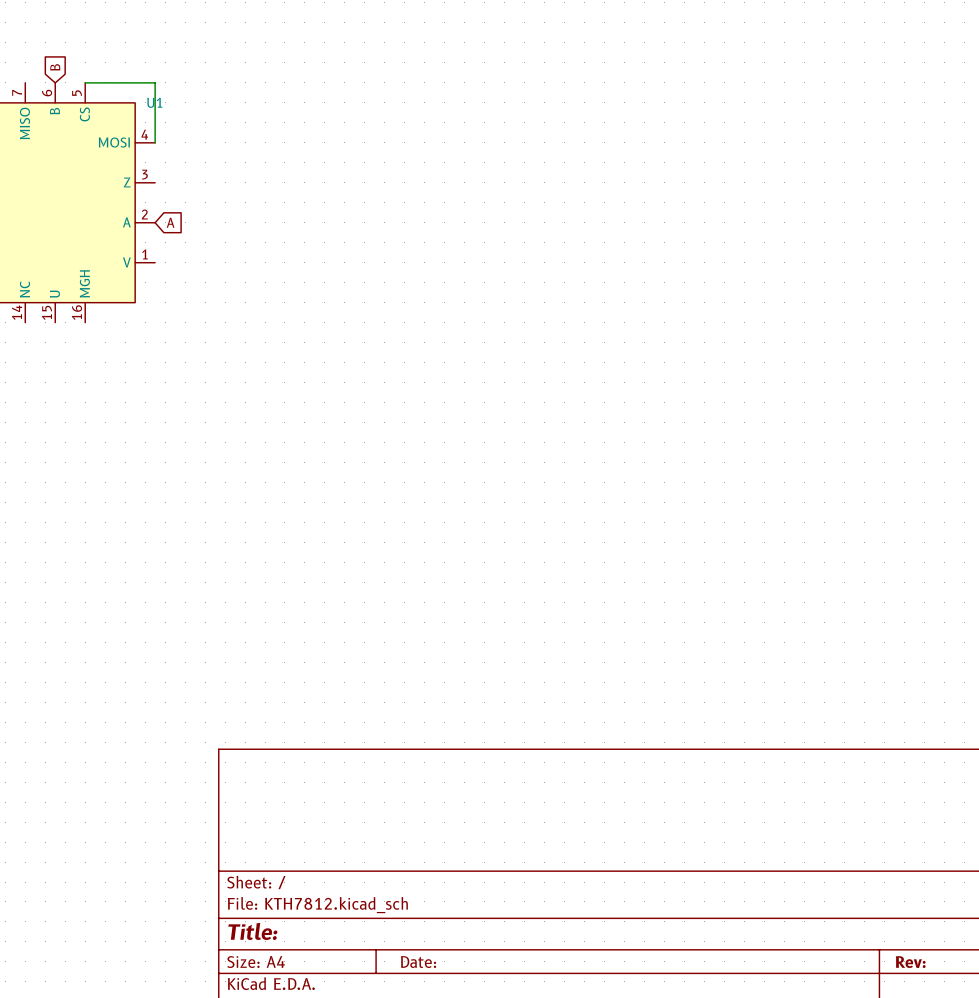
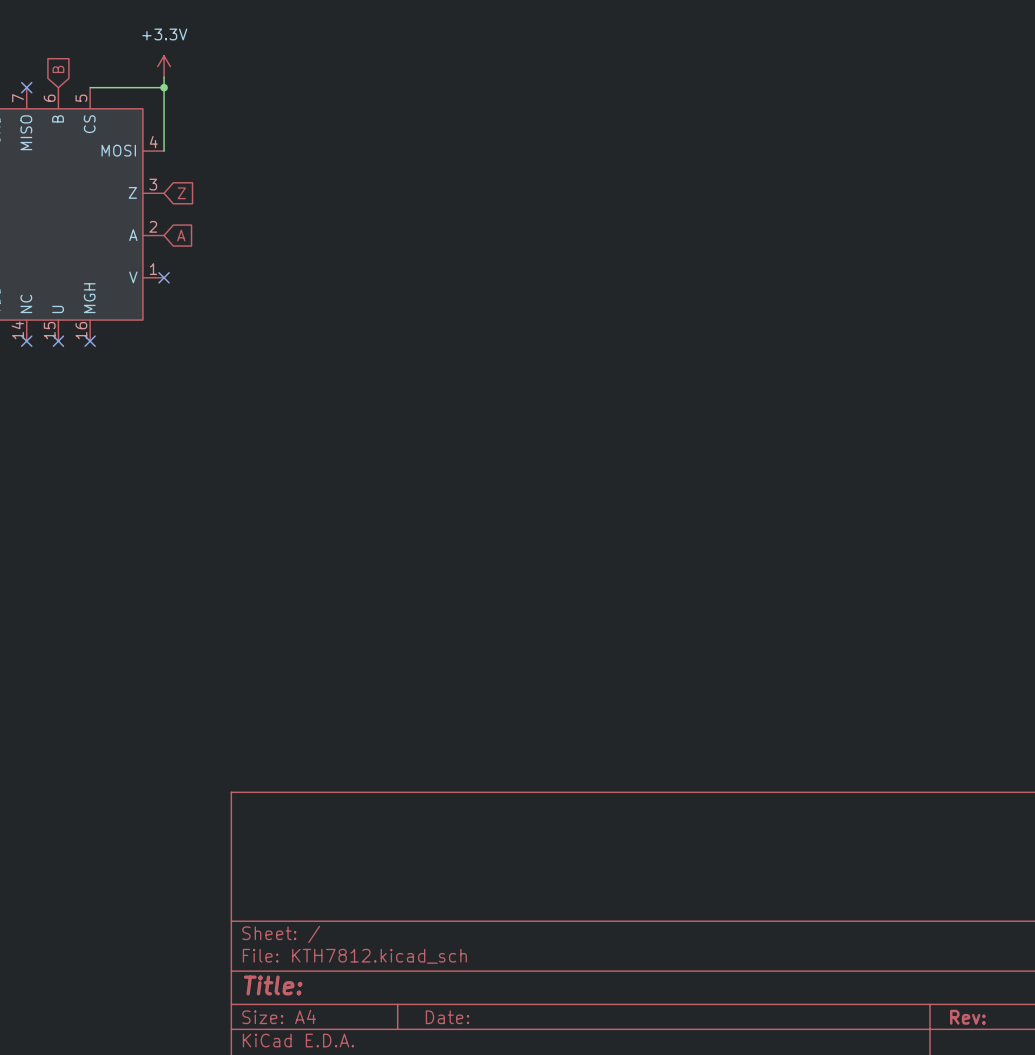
power symbol: none -> +3.3V (164, 66)
wire: none -> (164, 77) (164, 87)
no-connect mark: none -> (26, 87)
junction: none -> (164, 87)
U1 name: U1 (154, 102) -> none
global label: none -> Z (181, 193)
no-connect mark: none -> (164, 277)
no-connect mark: none -> (26, 341)
no-connect mark: none -> (58, 341)
no-connect mark: none -> (90, 341)

